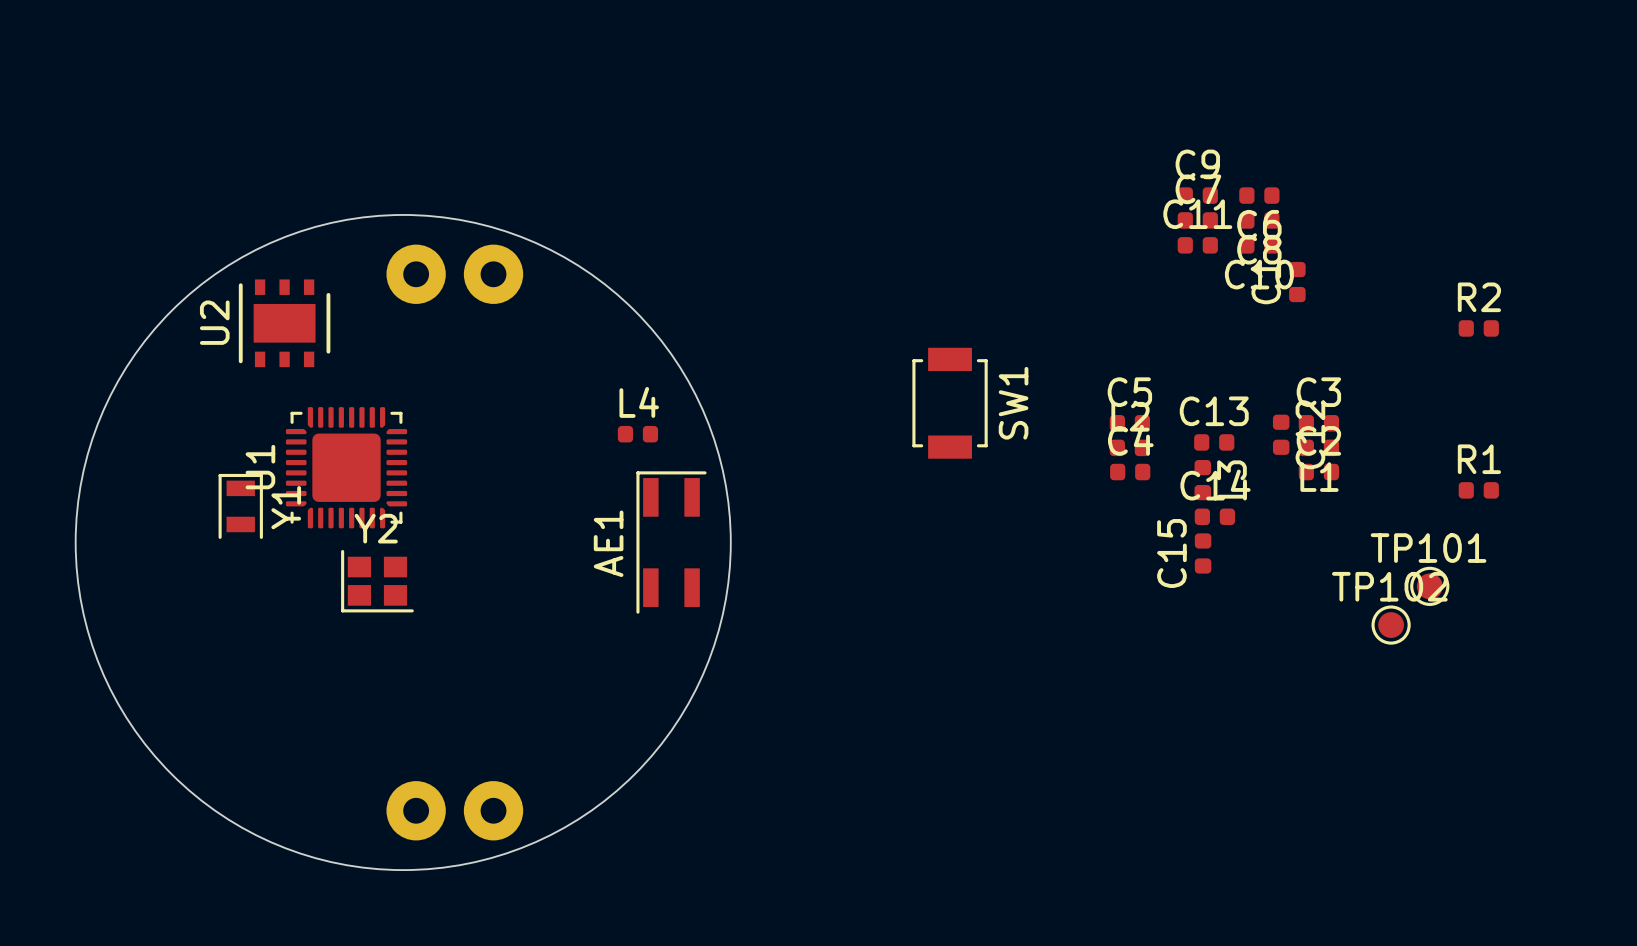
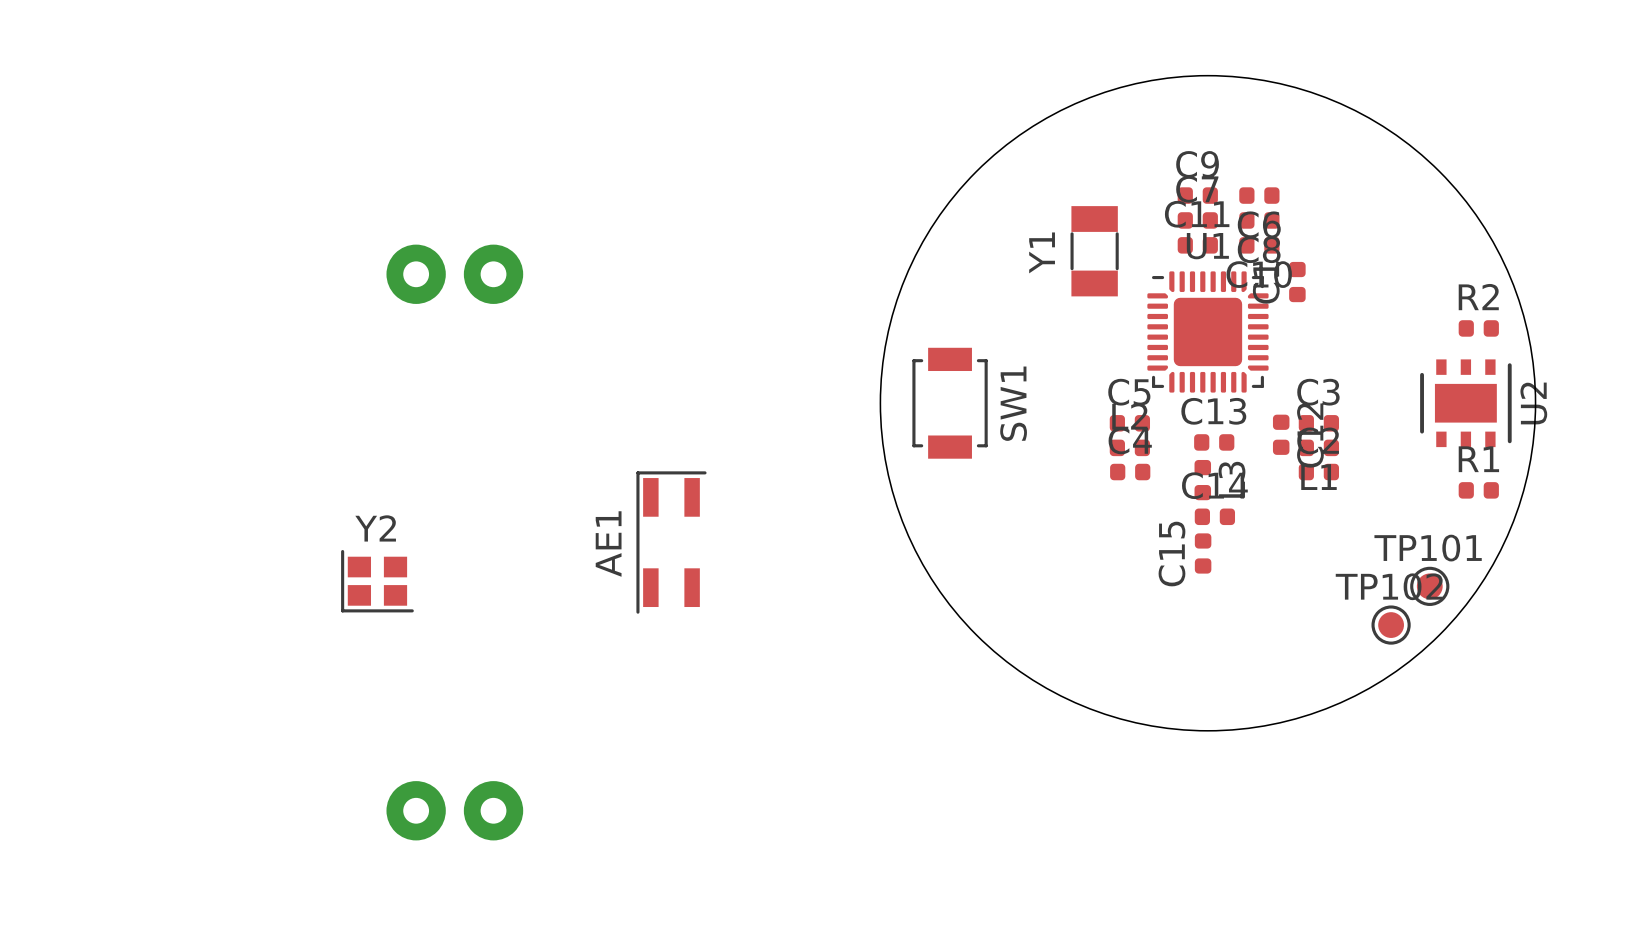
round board edge: none -> [879, 75, 1537, 732]
round board edge: [75, 214, 732, 871] -> none
U2 rotation: 0° (284, 323) -> 180° (1465, 403)
U2 position: (284, 323) -> (1465, 403)
L4: (637, 434) -> none
U1 rotation: 0° (346, 467) -> 90° clockwise (1207, 331)
U1 position: (346, 467) -> (1207, 331)
Y1 footprint: [218, 473, 263, 539] -> [1070, 206, 1119, 297]
Y1 name position: Y1 (286, 507) -> Y1 (1042, 252)

